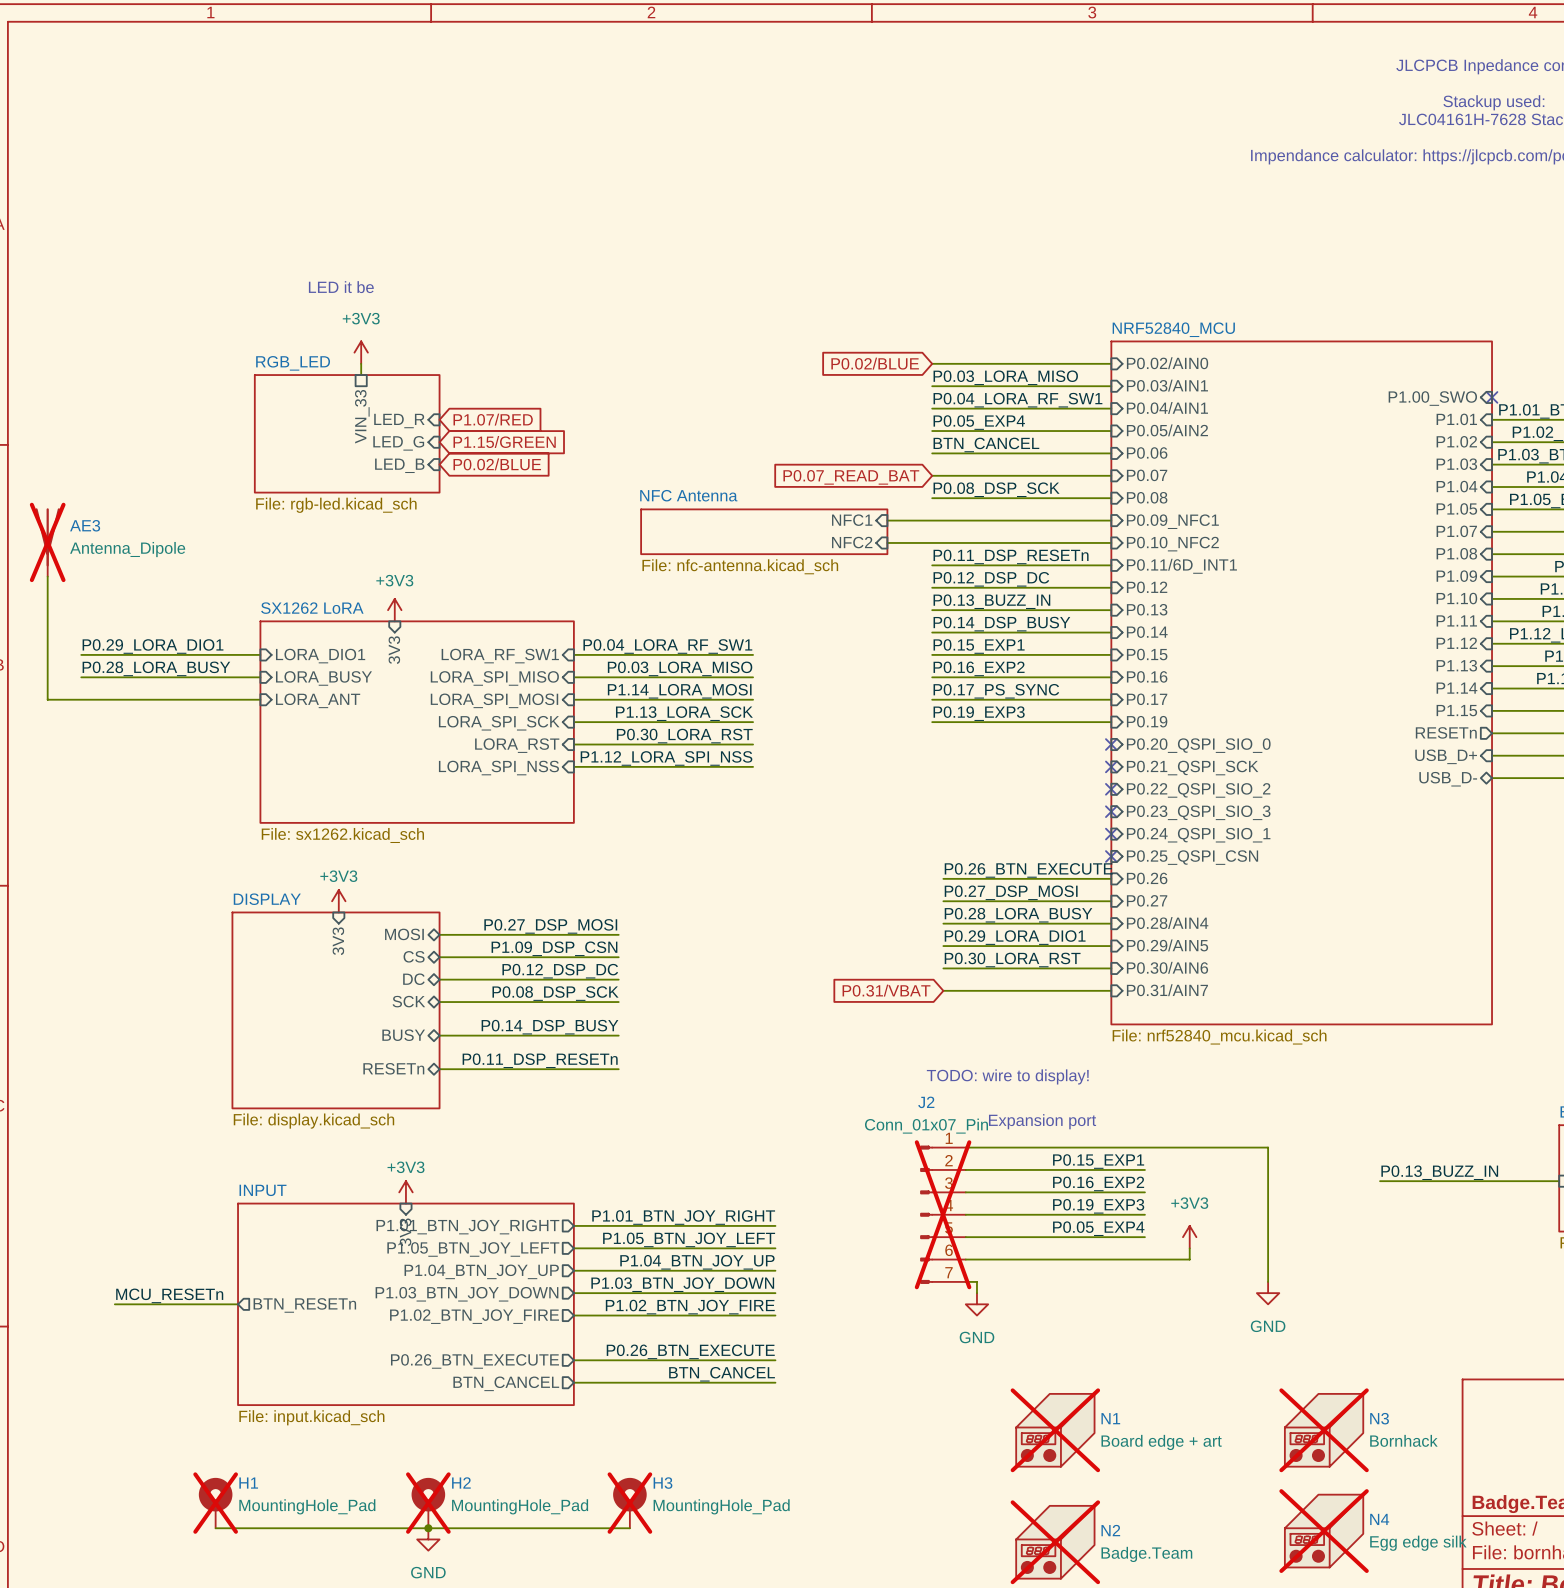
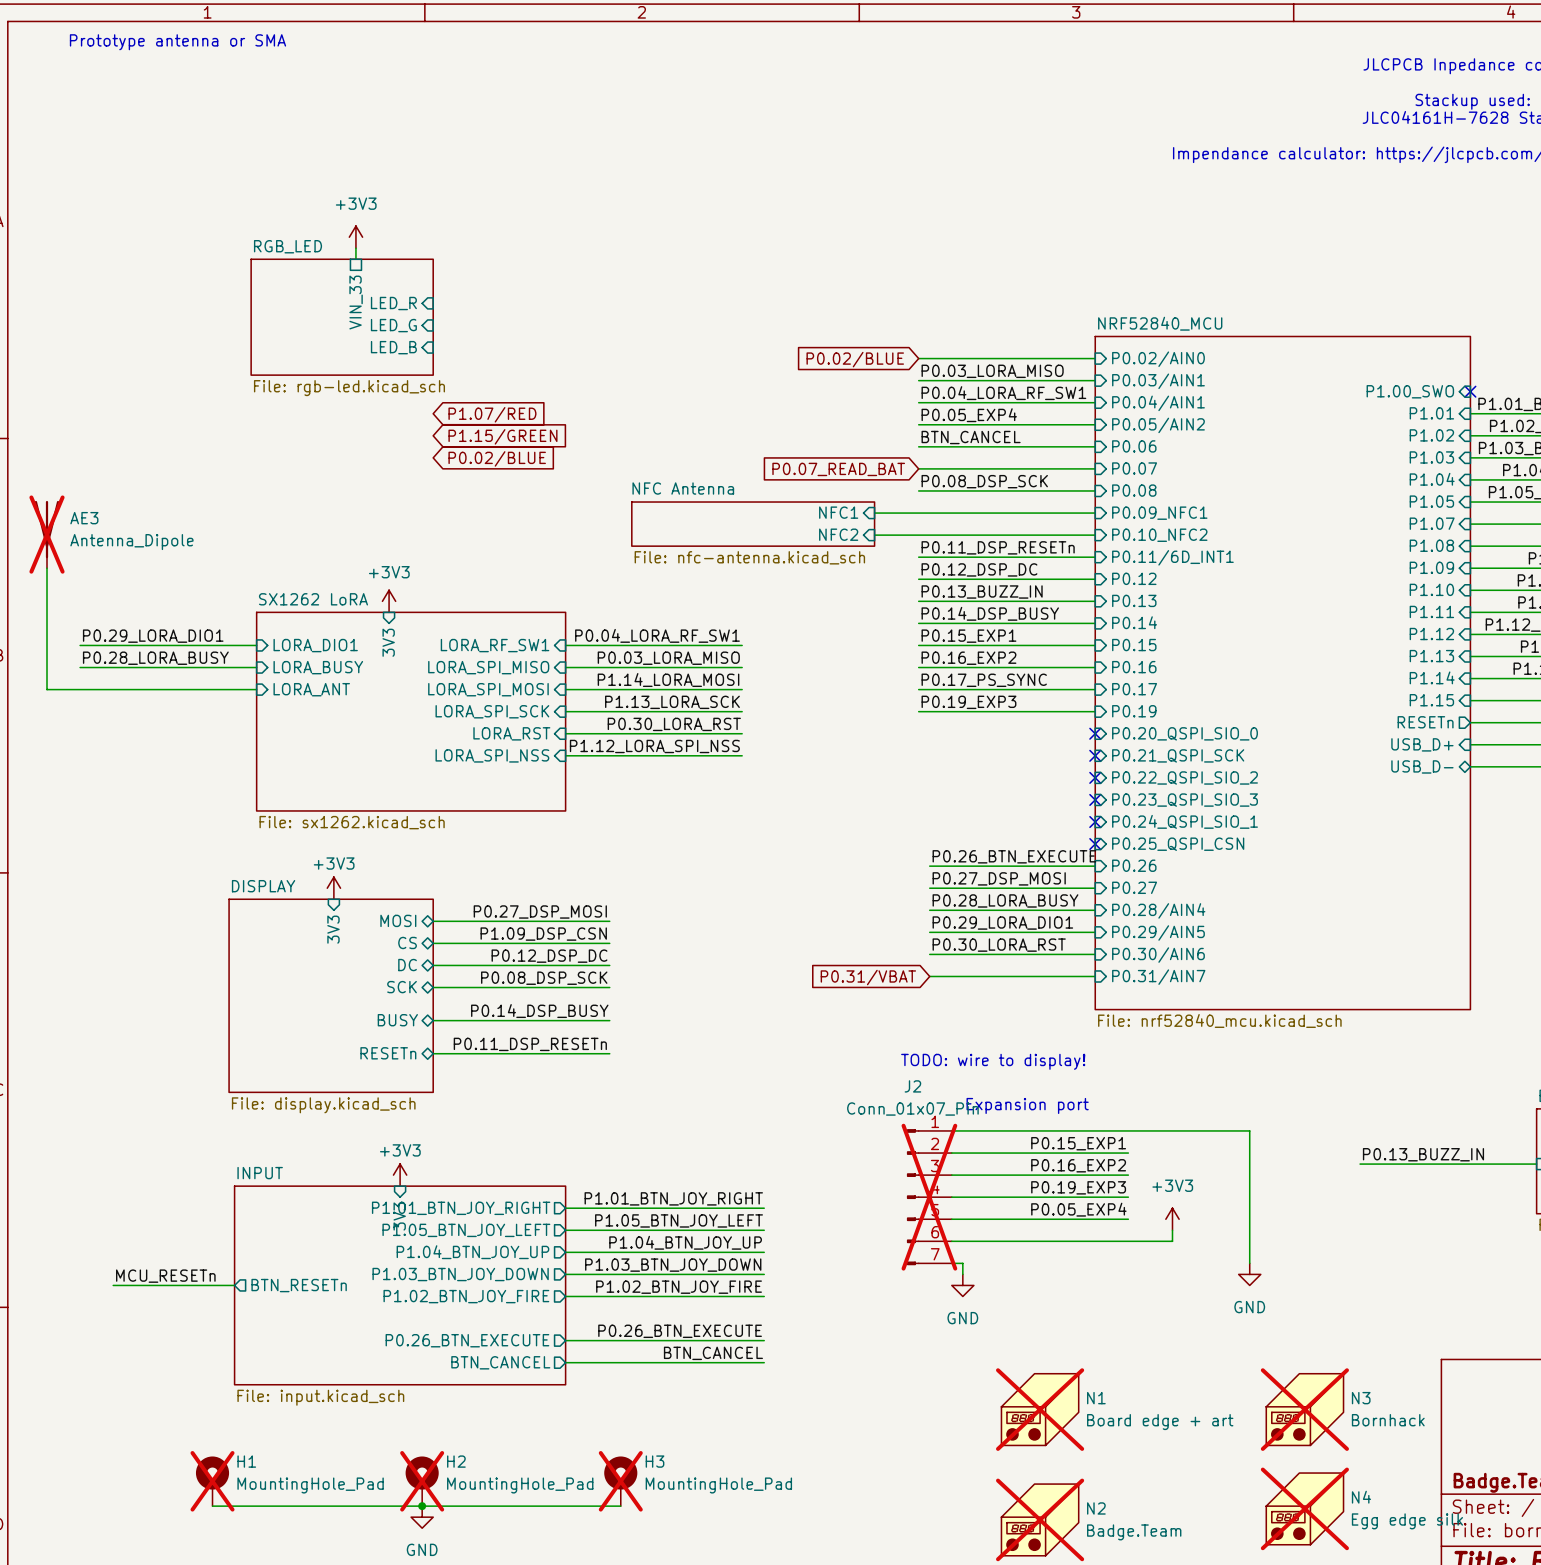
text: none -> Prototype antenna or SMA (177, 42)
text: LED it be (341, 287) -> none
power symbol position: +3V3 (361, 352) -> +3V3 (355, 237)
wire: (361, 363) (361, 375) -> (355, 248) (355, 259)
sheet pin position: VIN_33 (362, 416) -> VIN_33 (356, 302)
sheet pin position: LED_R (399, 421) -> LED_R (393, 303)
sheet RGB_LED position: (347, 433) -> (342, 317)
sheet pin position: LED_G (398, 443) -> LED_G (393, 325)
sheet pin position: LED_B (399, 465) -> LED_B (393, 347)

